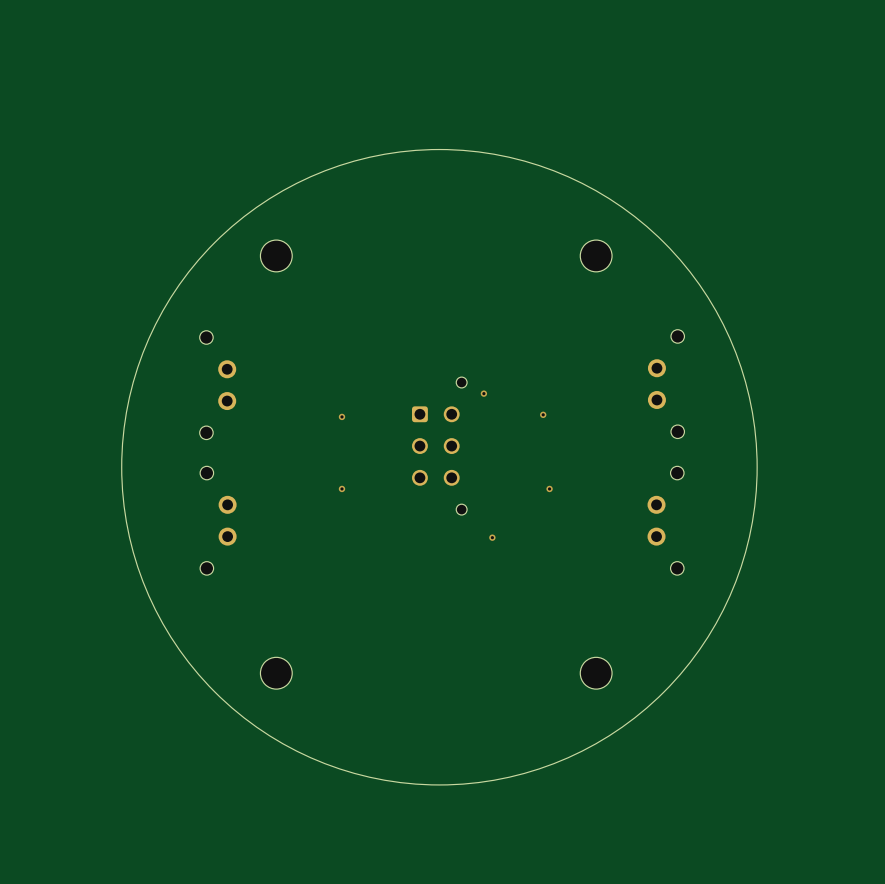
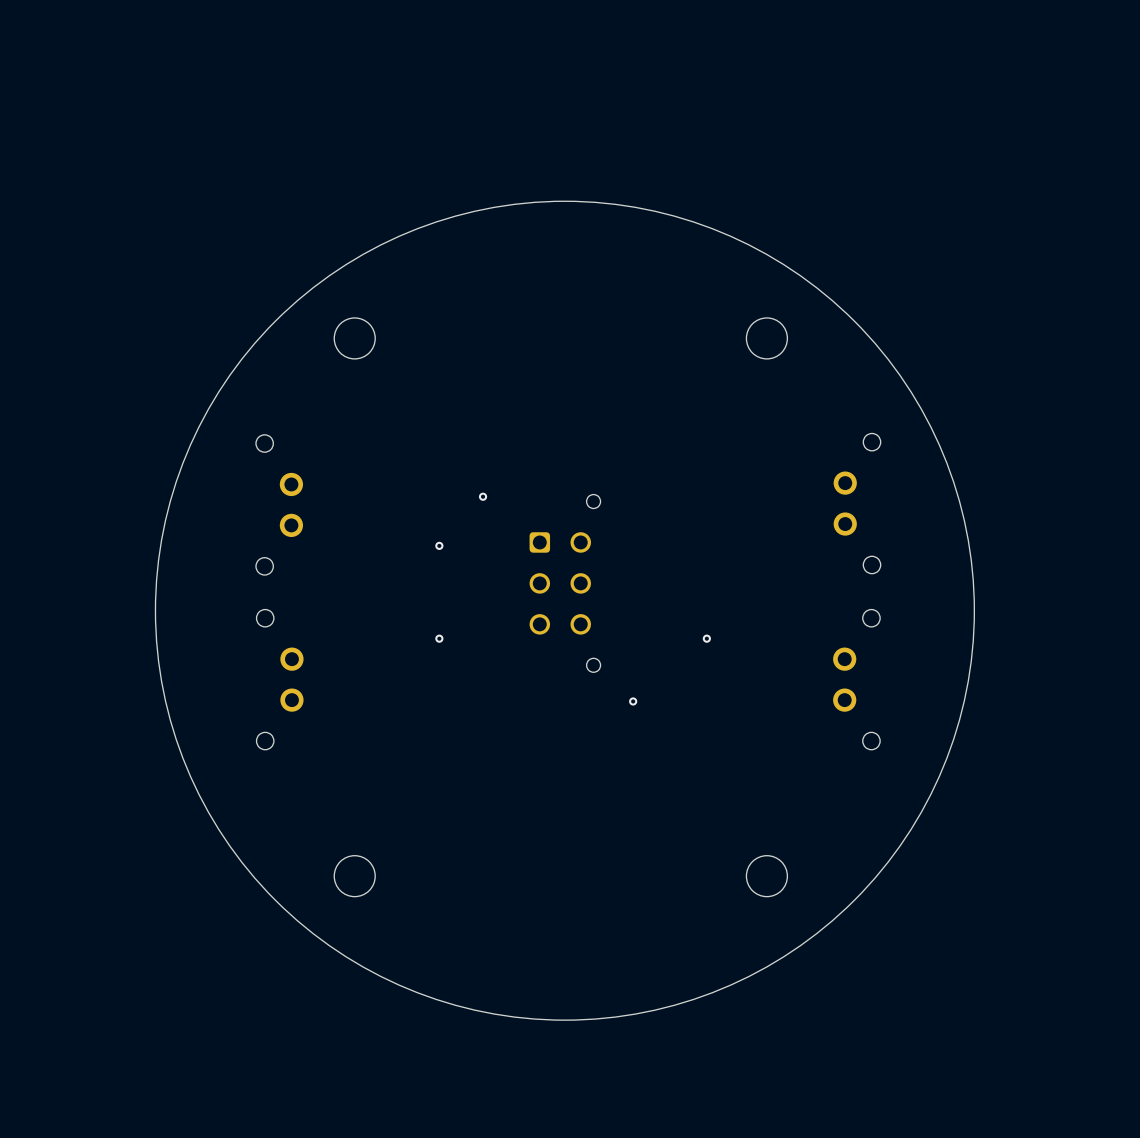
via: none -> (483, 496)
via: (483, 393) -> none
via: (543, 414) -> none

